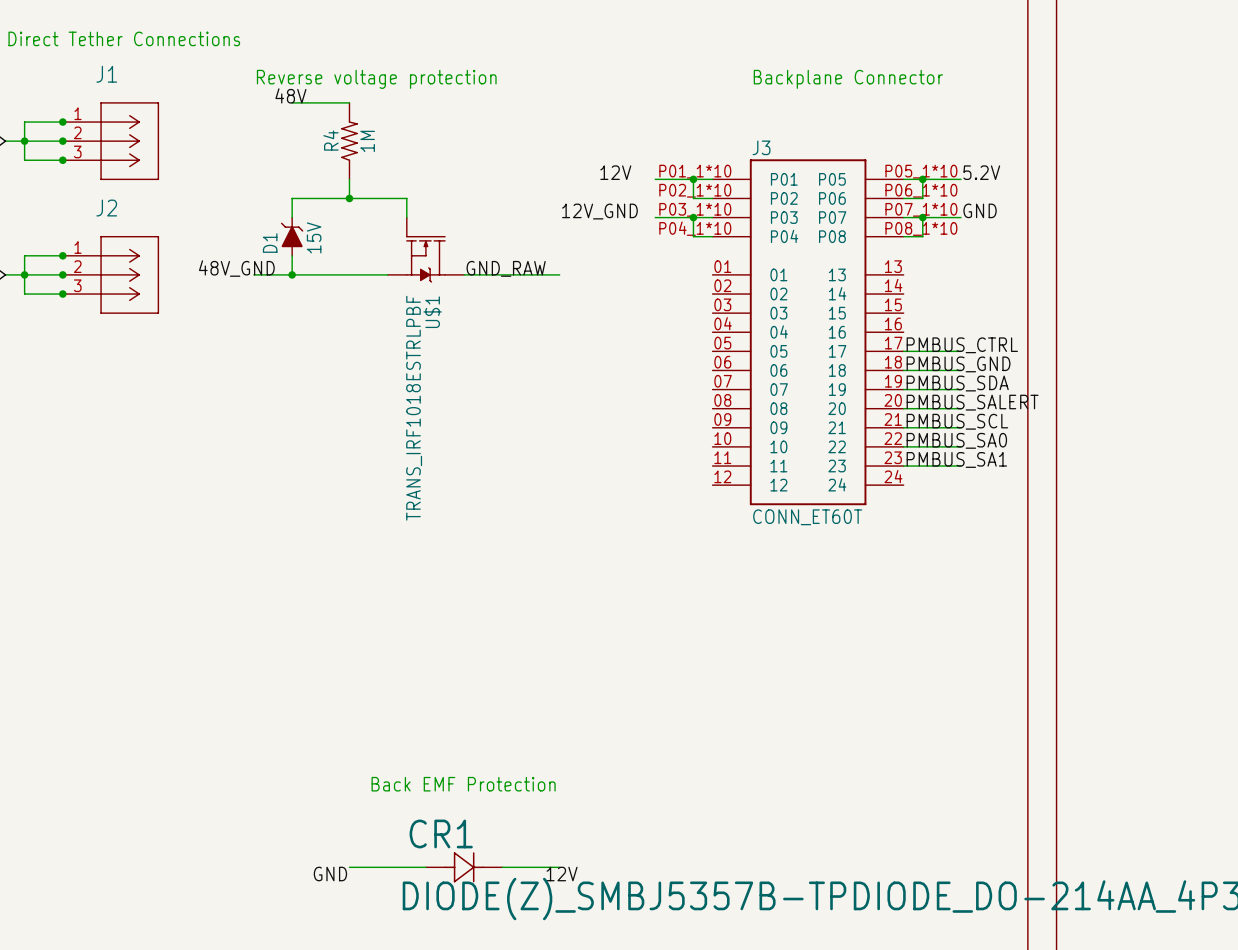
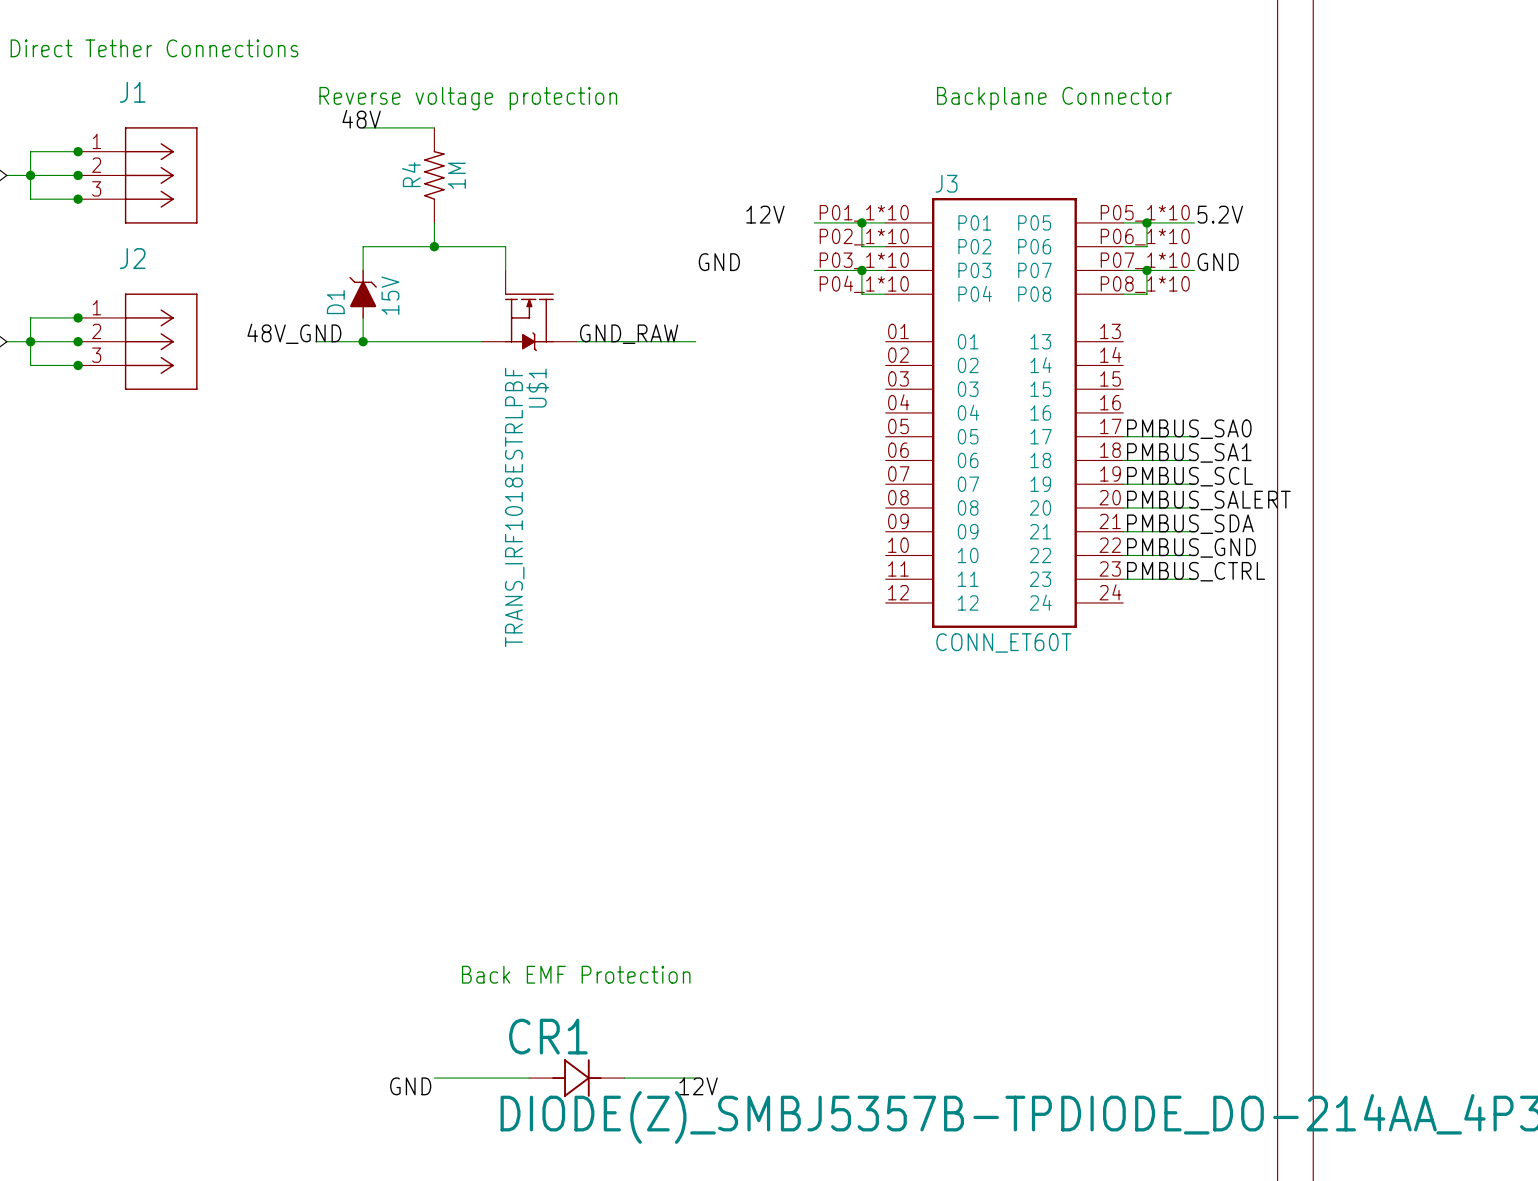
label: 12V_GND (599, 211) -> GND (719, 262)
label: PMBUS_CTRL (962, 345) -> PMBUS_SA0 (1189, 429)
label: PMBUS_GND (958, 364) -> PMBUS_SA1 (1189, 452)
label: PMBUS_SDA (957, 383) -> PMBUS_SCL (1190, 476)
label: PMBUS_SCL (957, 421) -> PMBUS_SDA (1190, 524)
label: PMBUS_SA0 (956, 440) -> PMBUS_GND (1191, 547)
label: PMBUS_SA1 (956, 459) -> PMBUS_CTRL (1196, 571)

